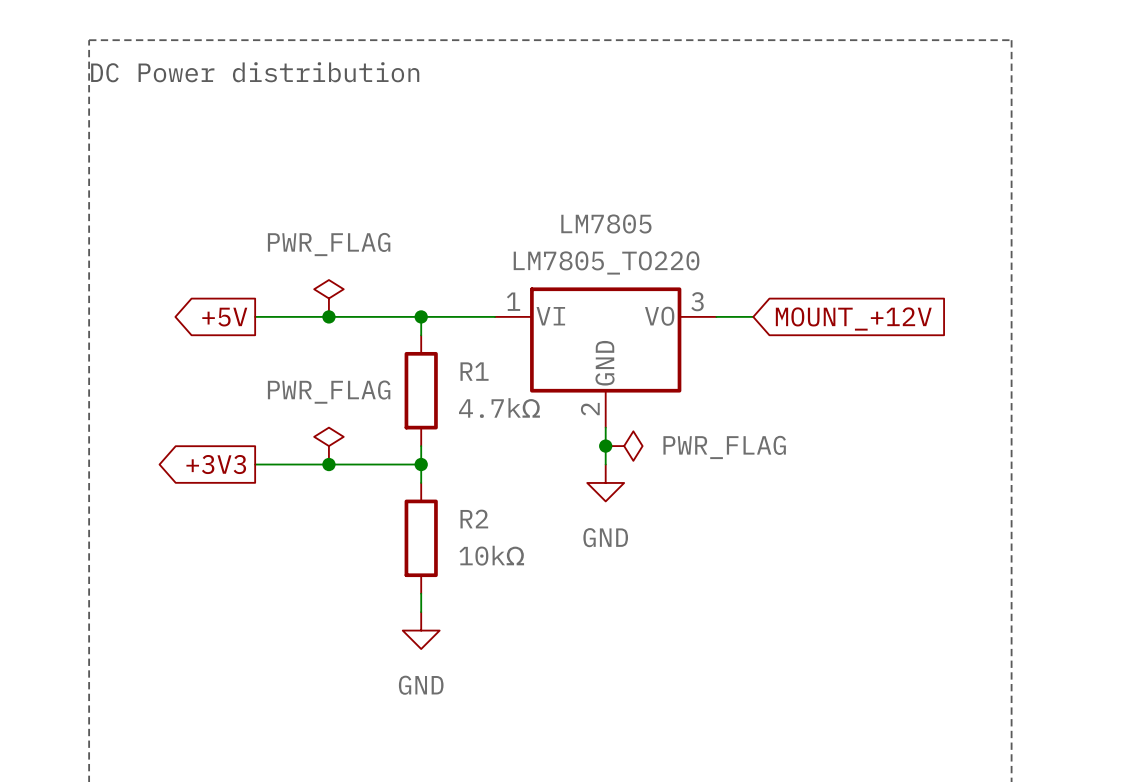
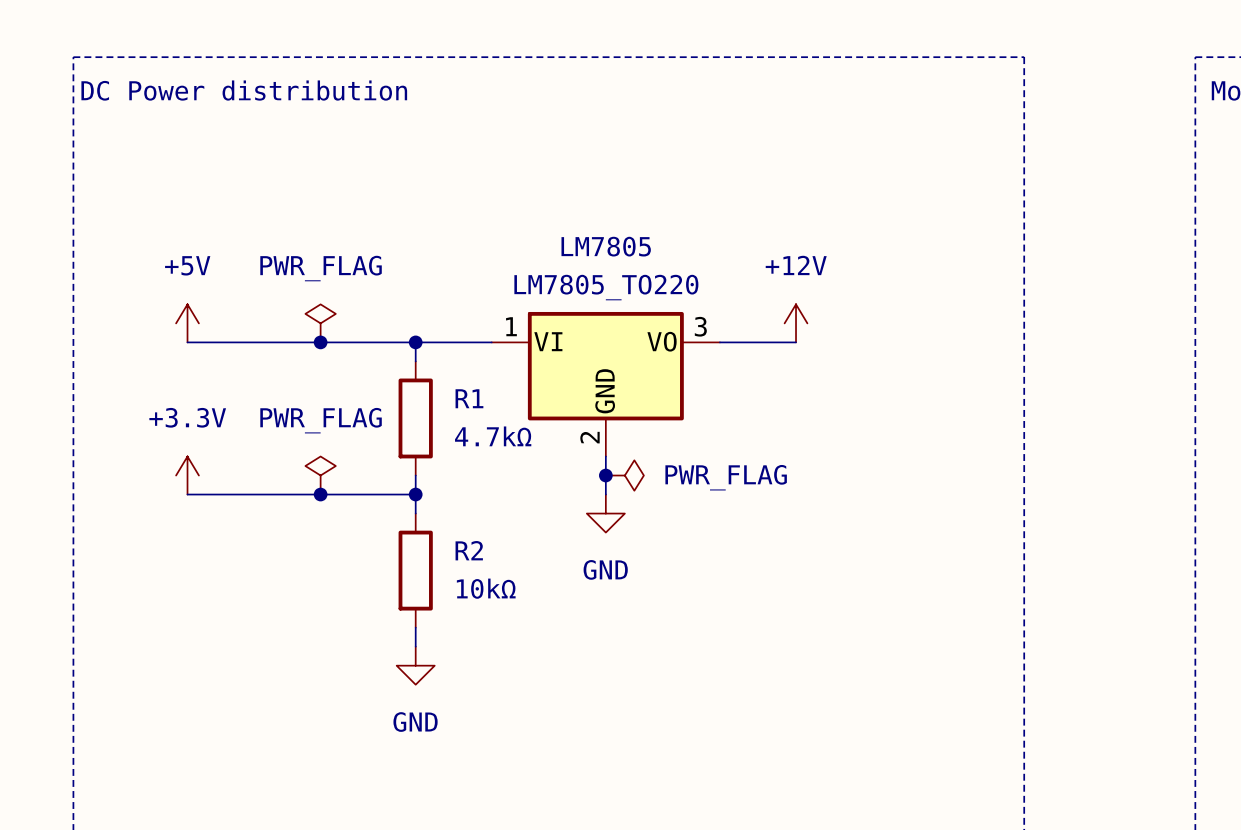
power symbol: none -> +5V (187, 323)
power symbol: none -> +12V (796, 323)
wire: none -> (187, 342) (244, 342)
wire: none -> (757, 342) (796, 342)
global label: +5V (224, 317) -> none
global label: MOUNT_+12V (853, 319) -> none
power symbol: none -> +3.3V (187, 475)
wire: none -> (187, 494) (244, 494)
global label: +3V3 (216, 464) -> none

